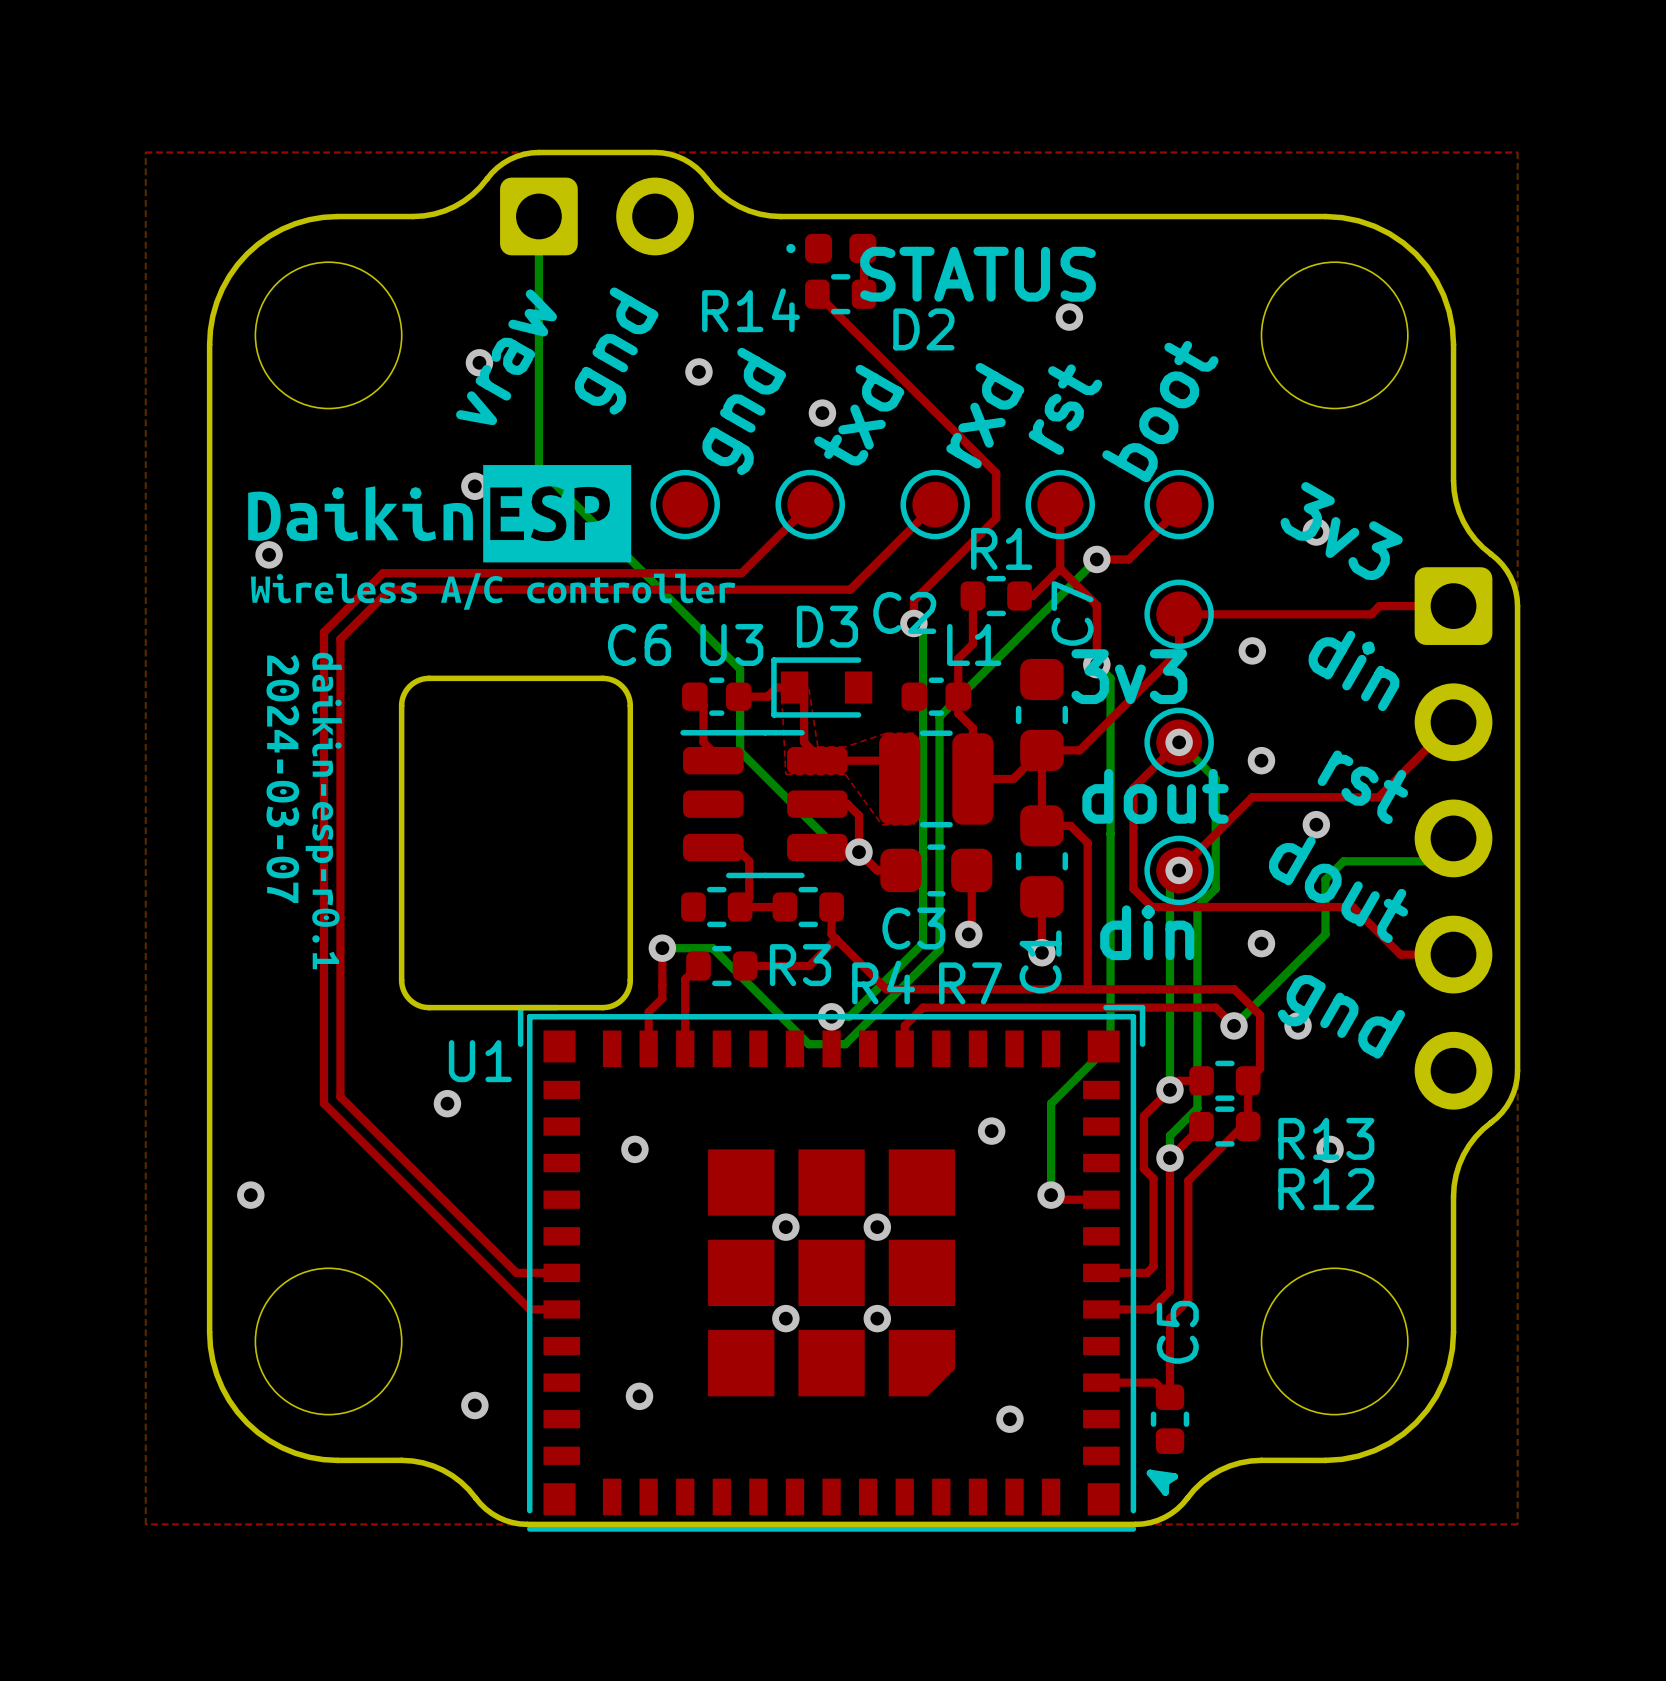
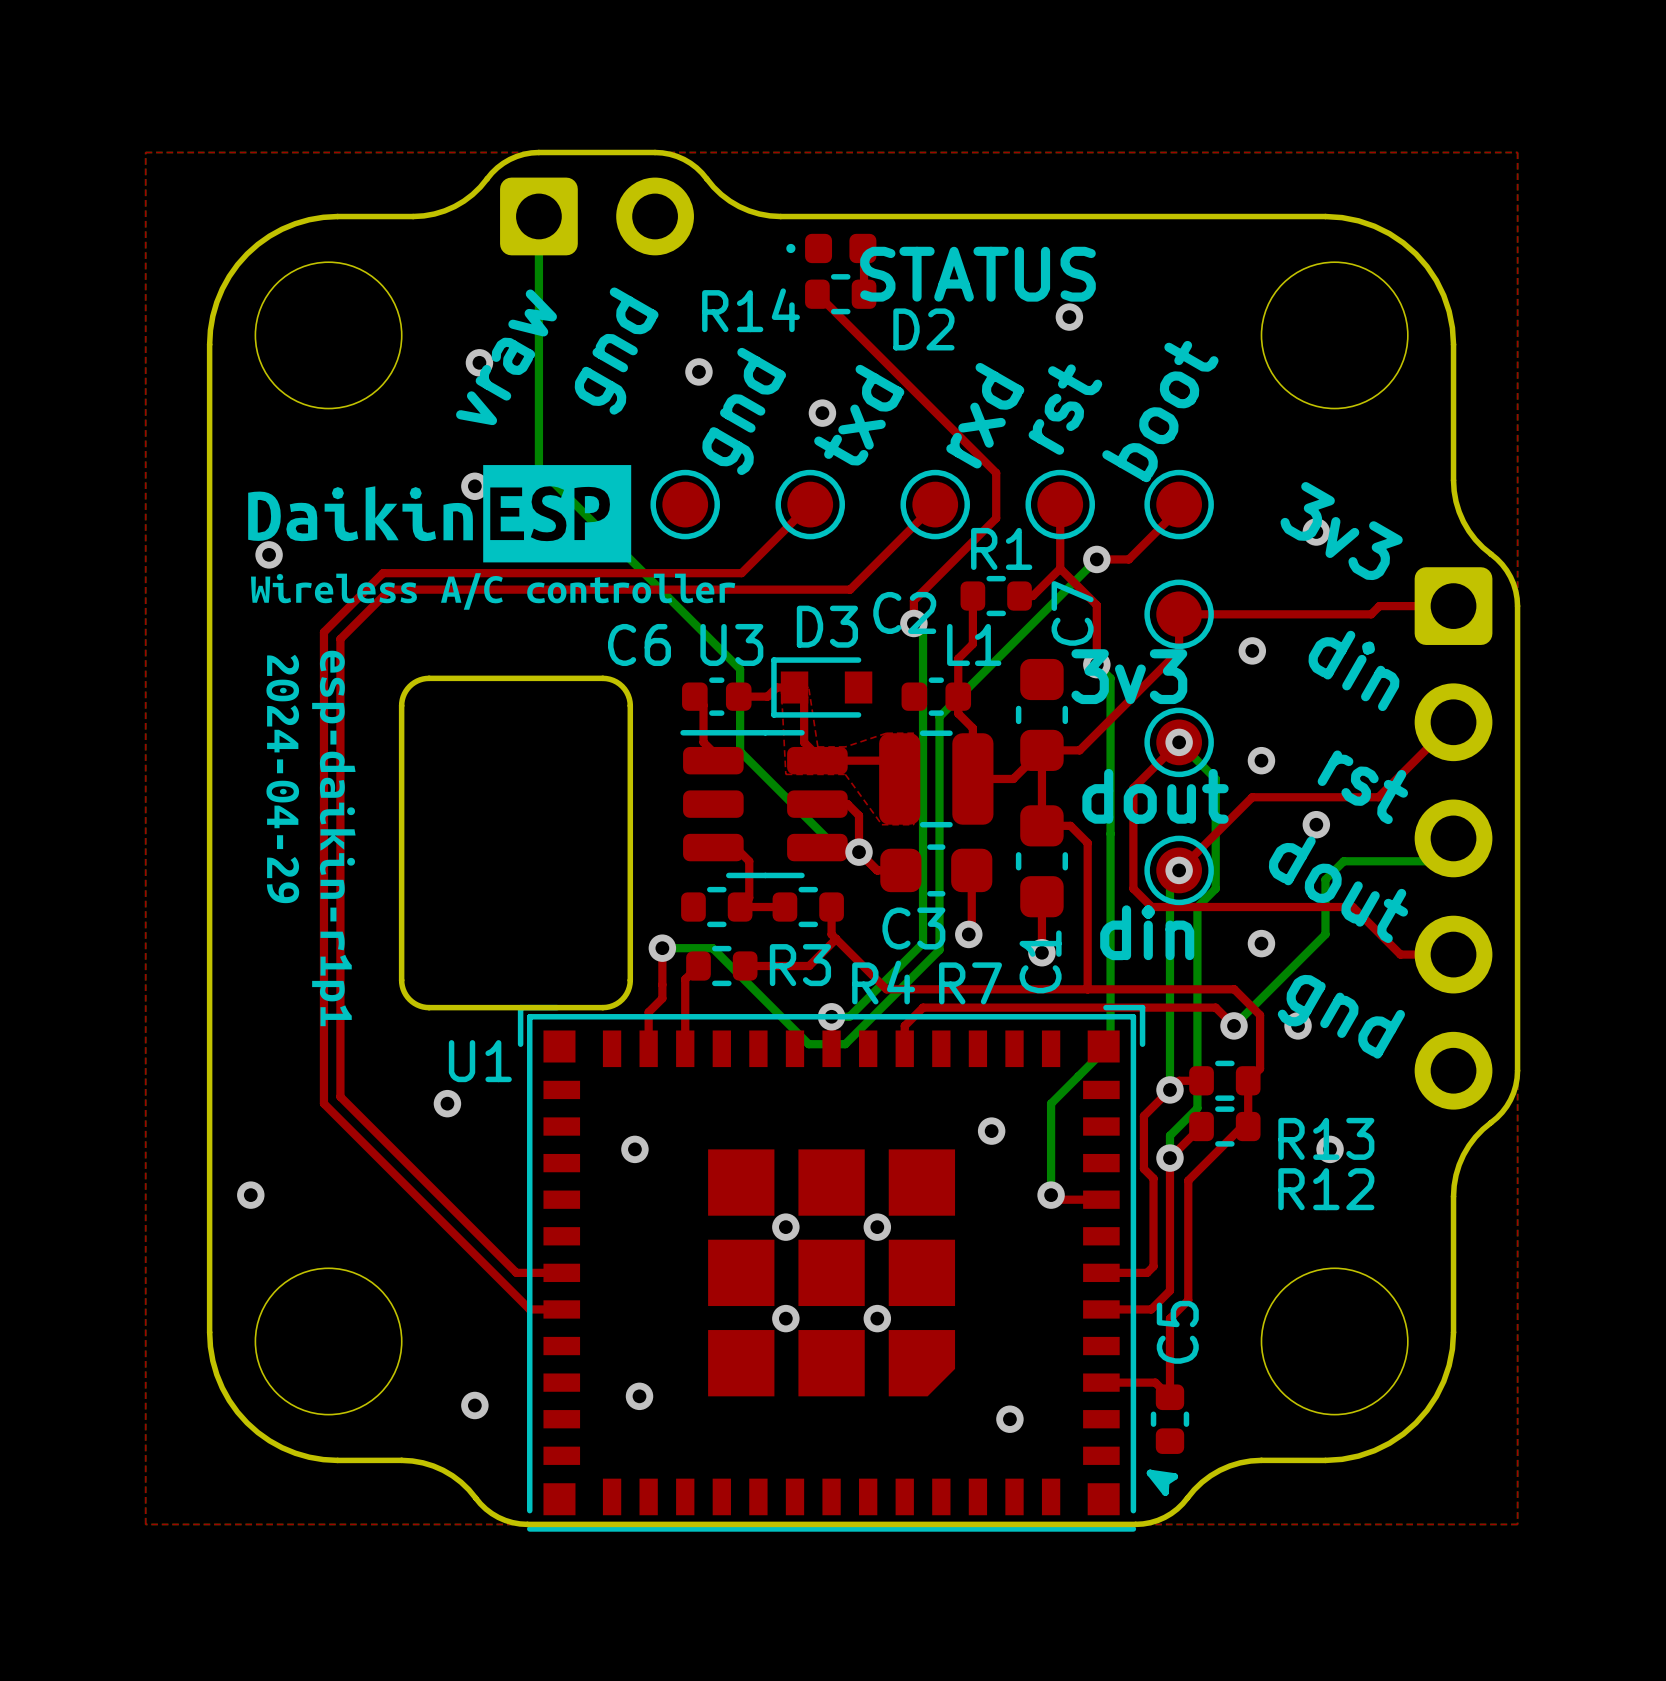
drawing shape: [305, 652, 343, 970] -> [312, 650, 356, 1027]
drawing shape: [266, 654, 300, 904] -> [266, 654, 300, 904]

